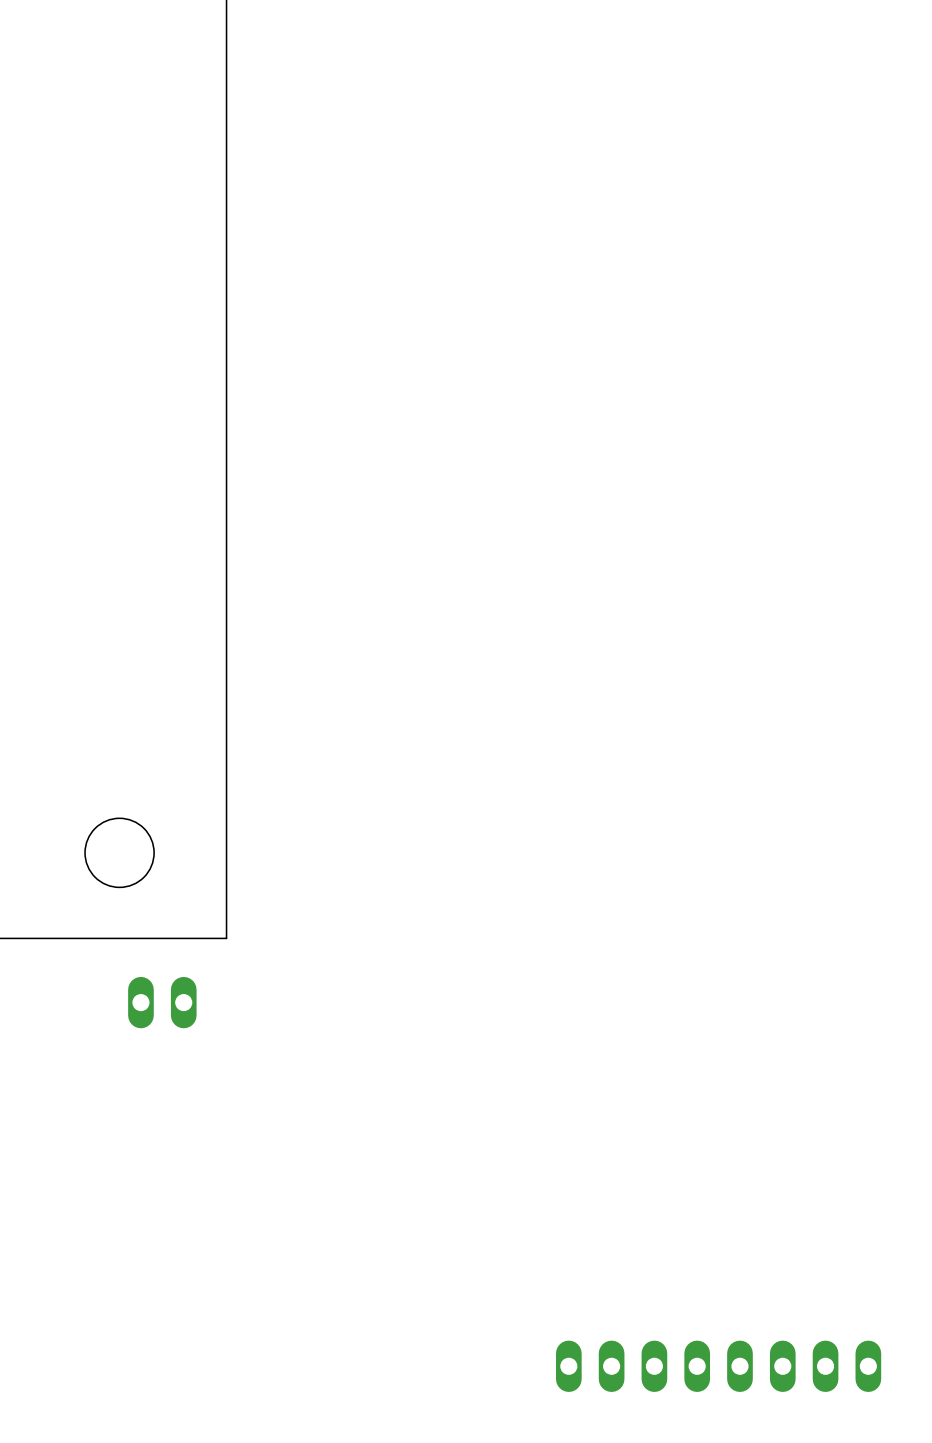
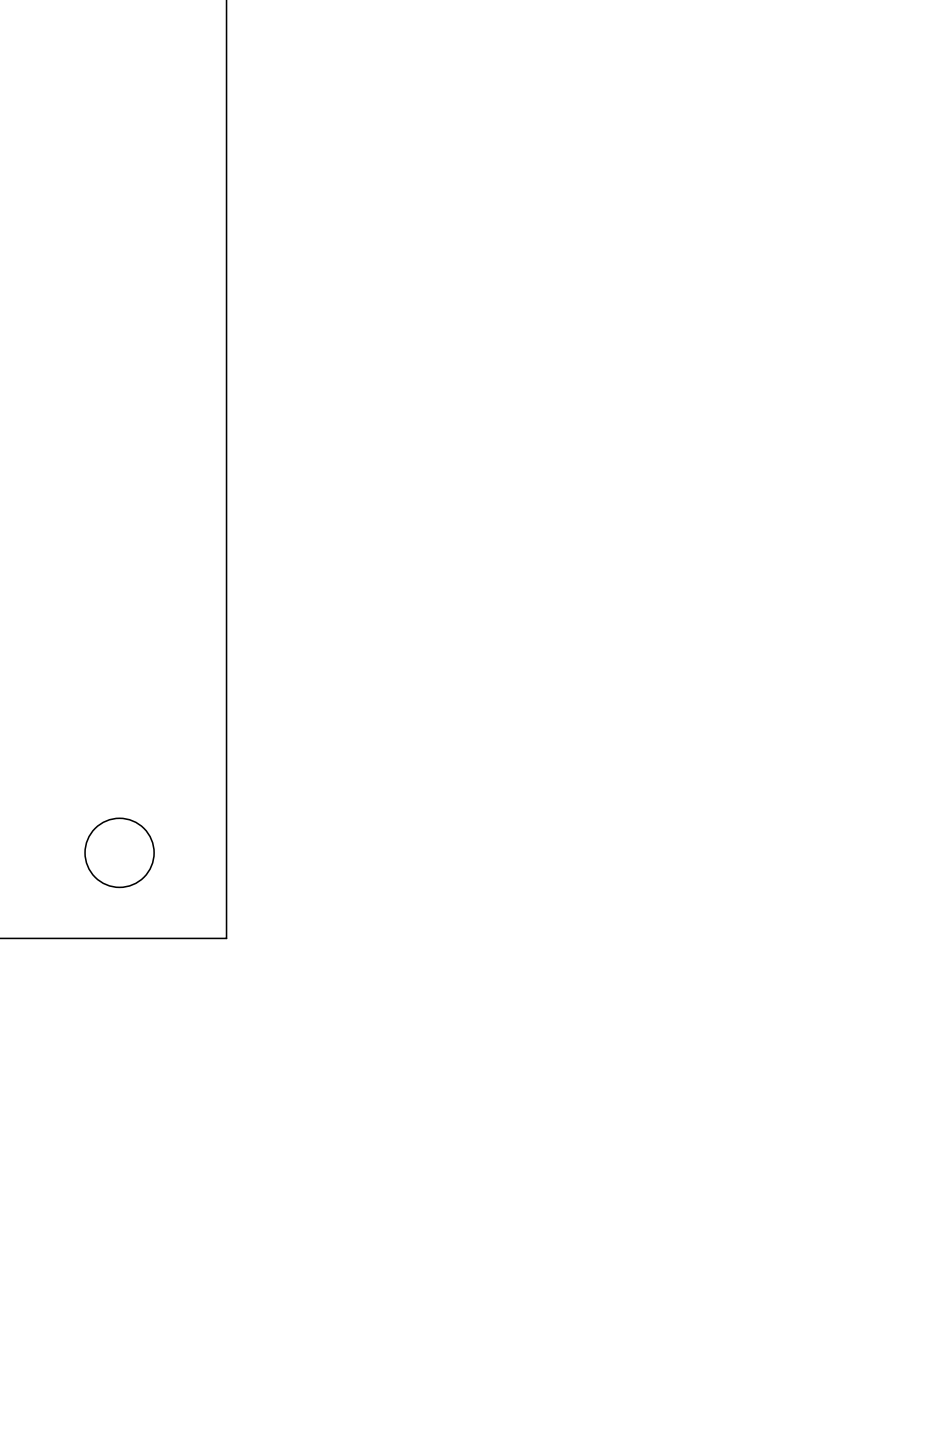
part: (162, 1002) -> none
part: (718, 1366) -> none

